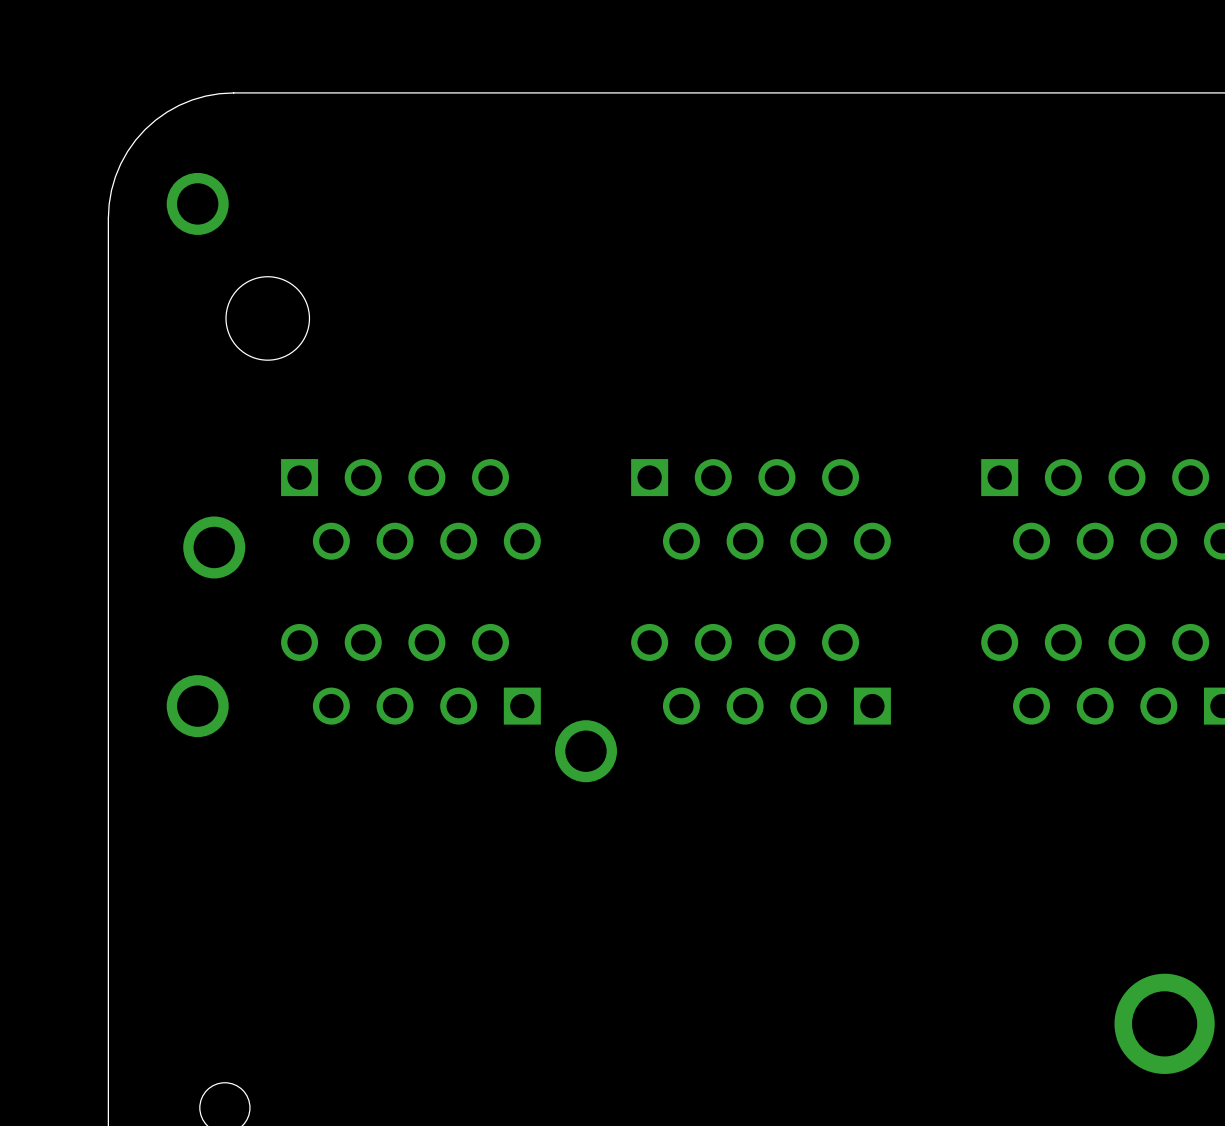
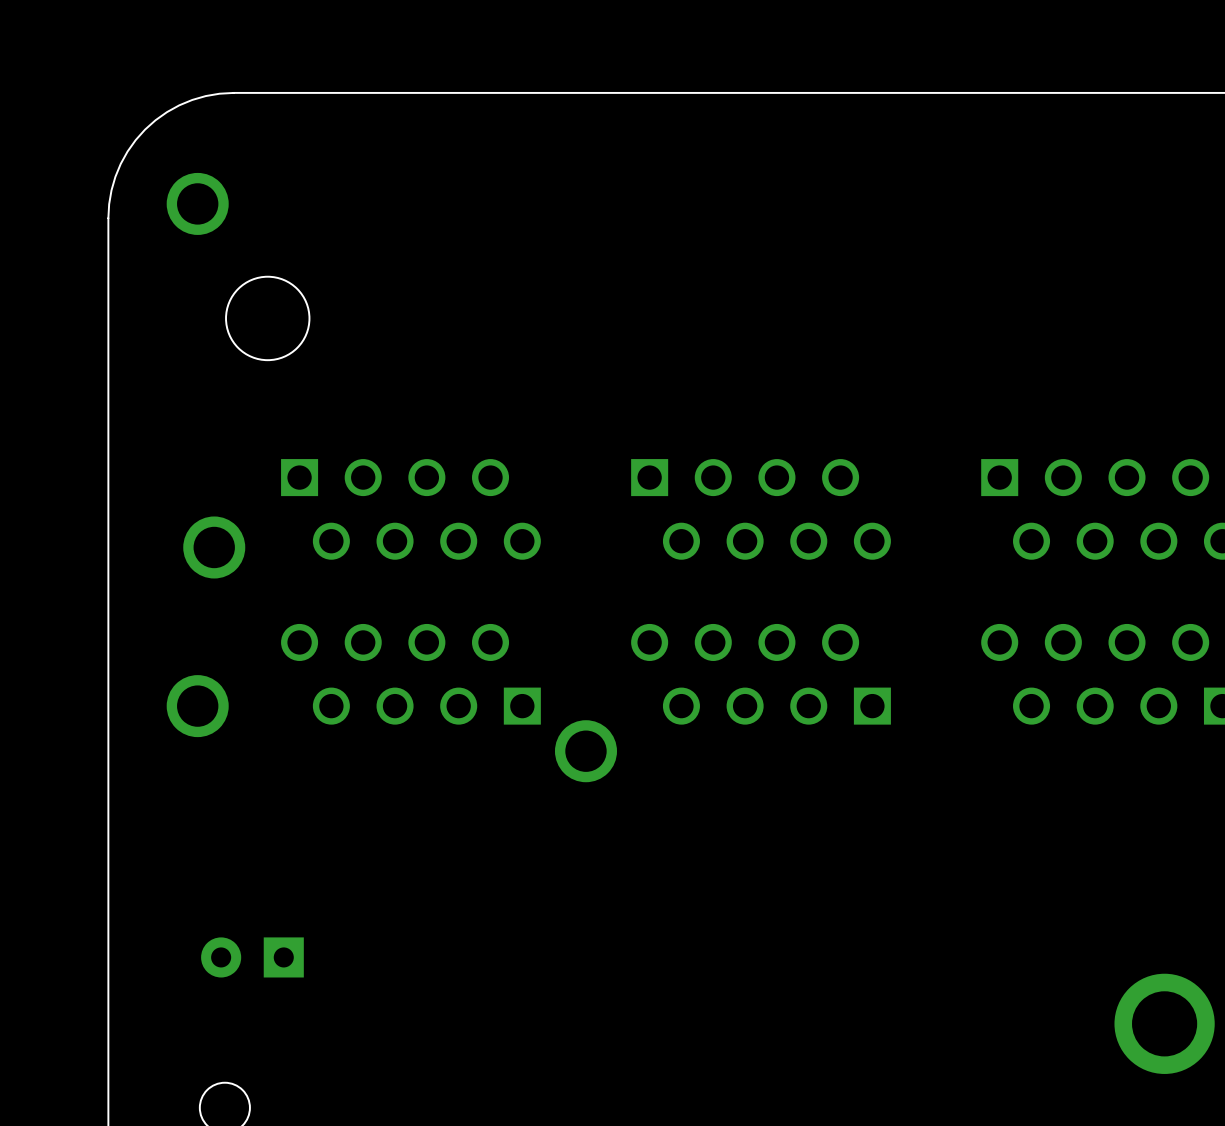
part: none -> (252, 957)

